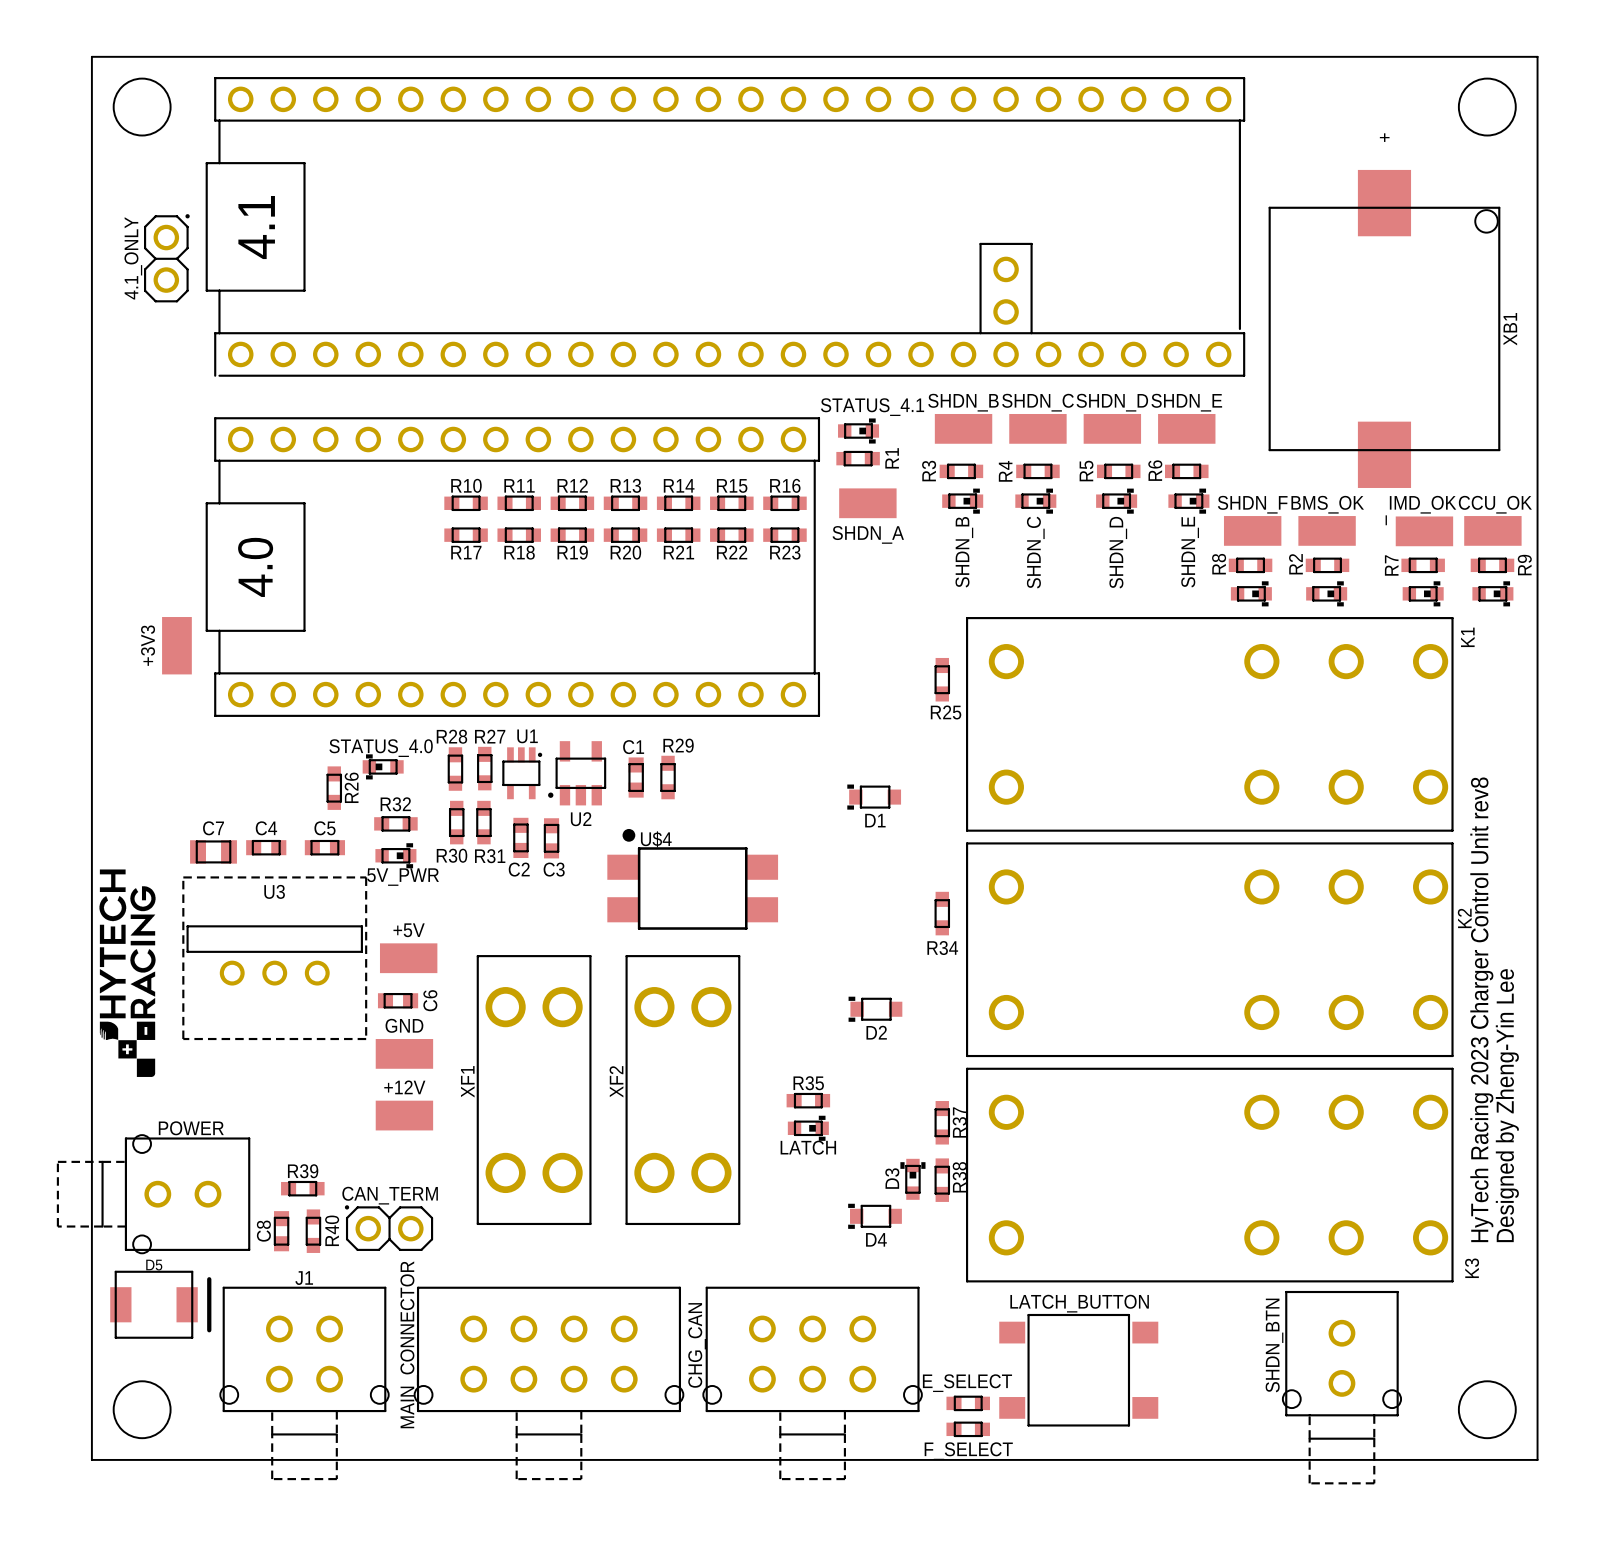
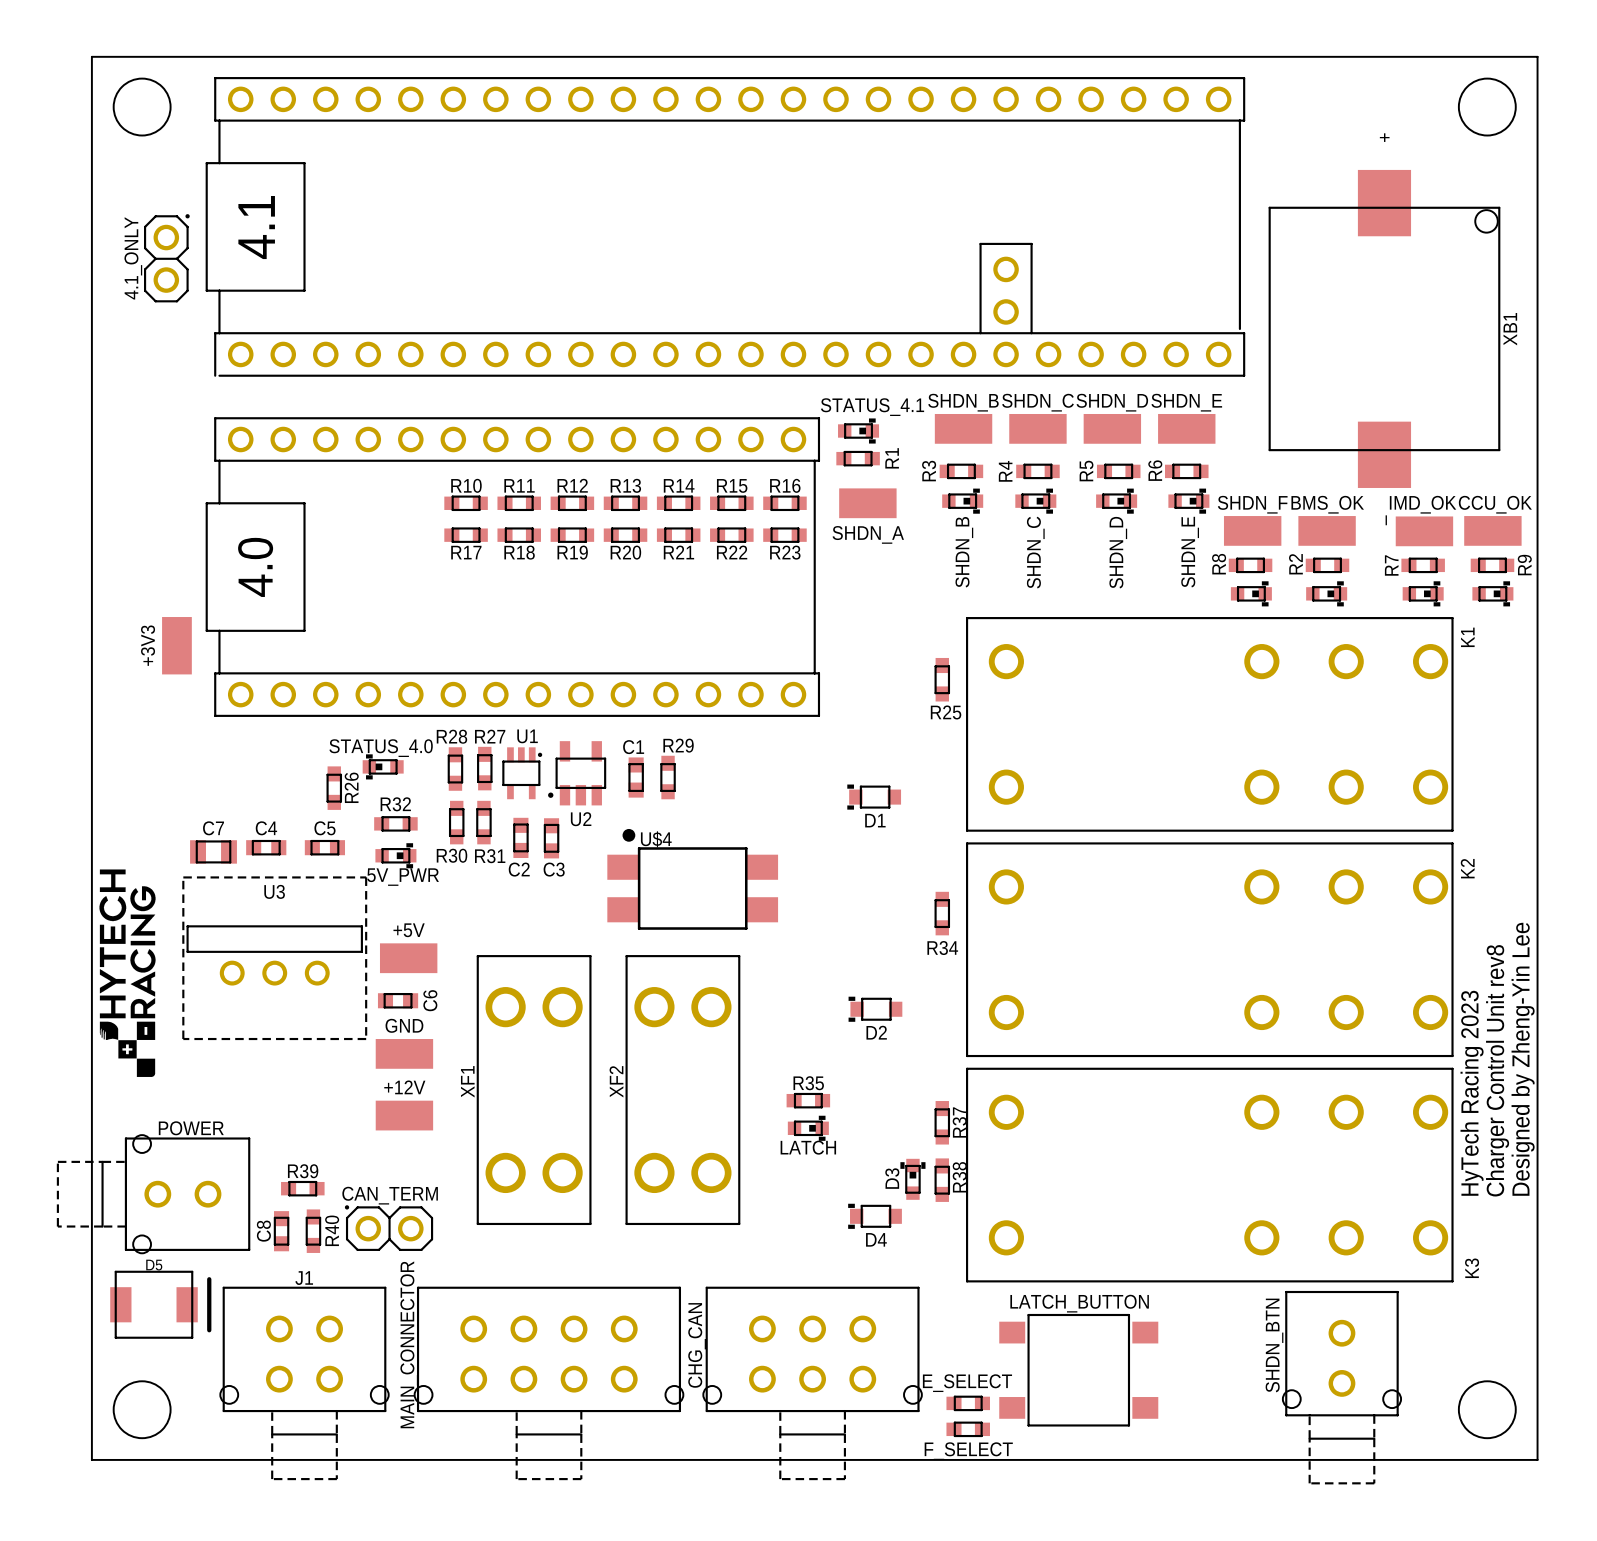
K2 name position: K2 (1464, 918) -> K2 (1467, 868)
text: HyTech Racing 2023 Charger Control Unit rev8 (1481, 1009) -> Charger Control Unit rev8 (1497, 1070)
text: none -> HyTech Racing 2023 (1472, 1093)
text position: Designed by Zheng-Yin Lee (1507, 1105) -> Designed by Zheng-Yin Lee (1523, 1059)

